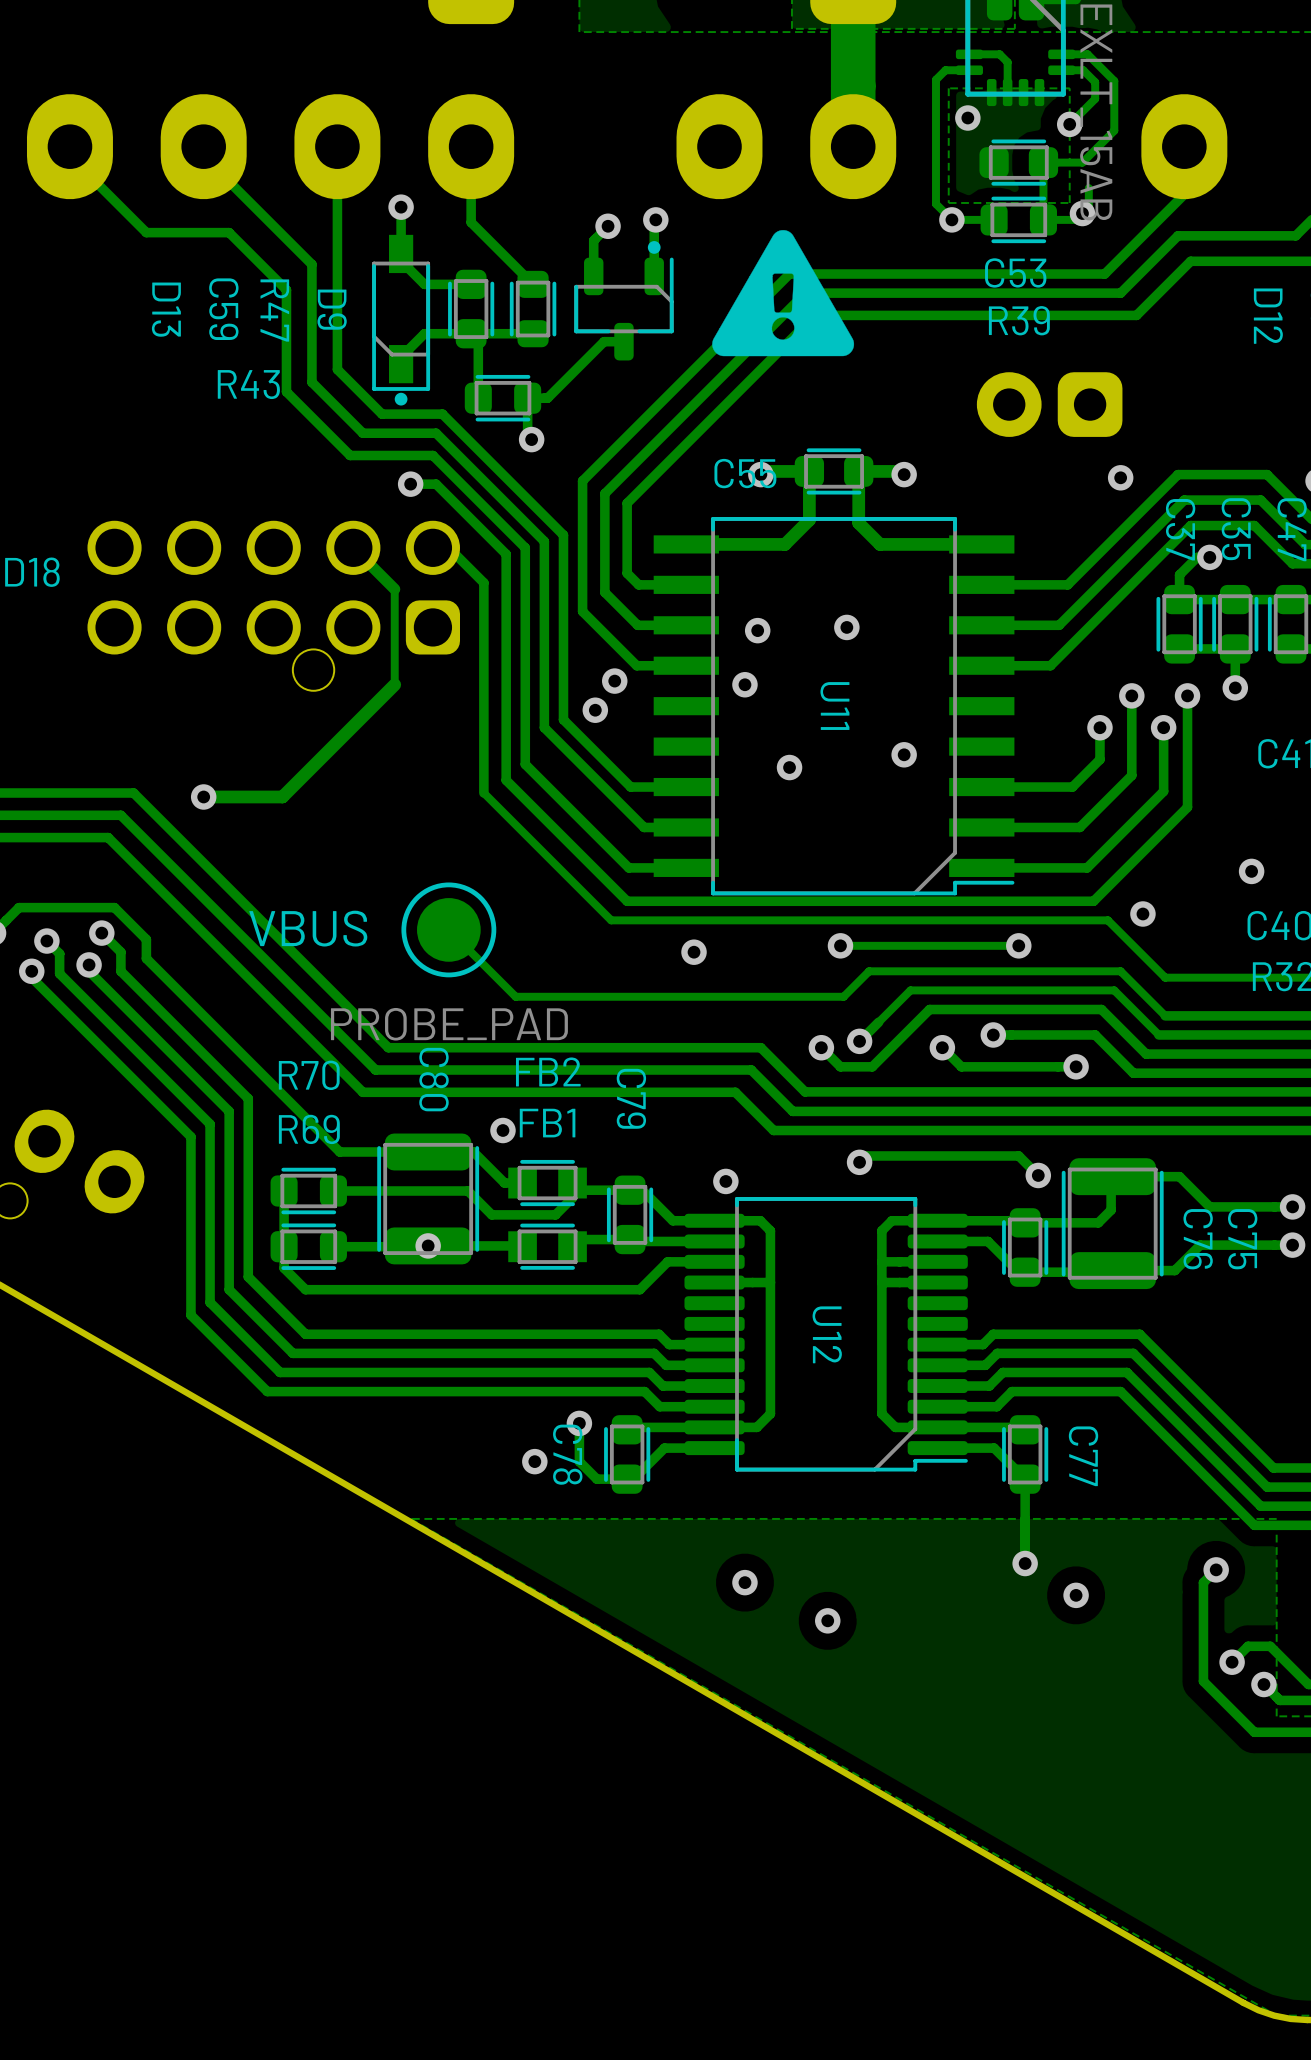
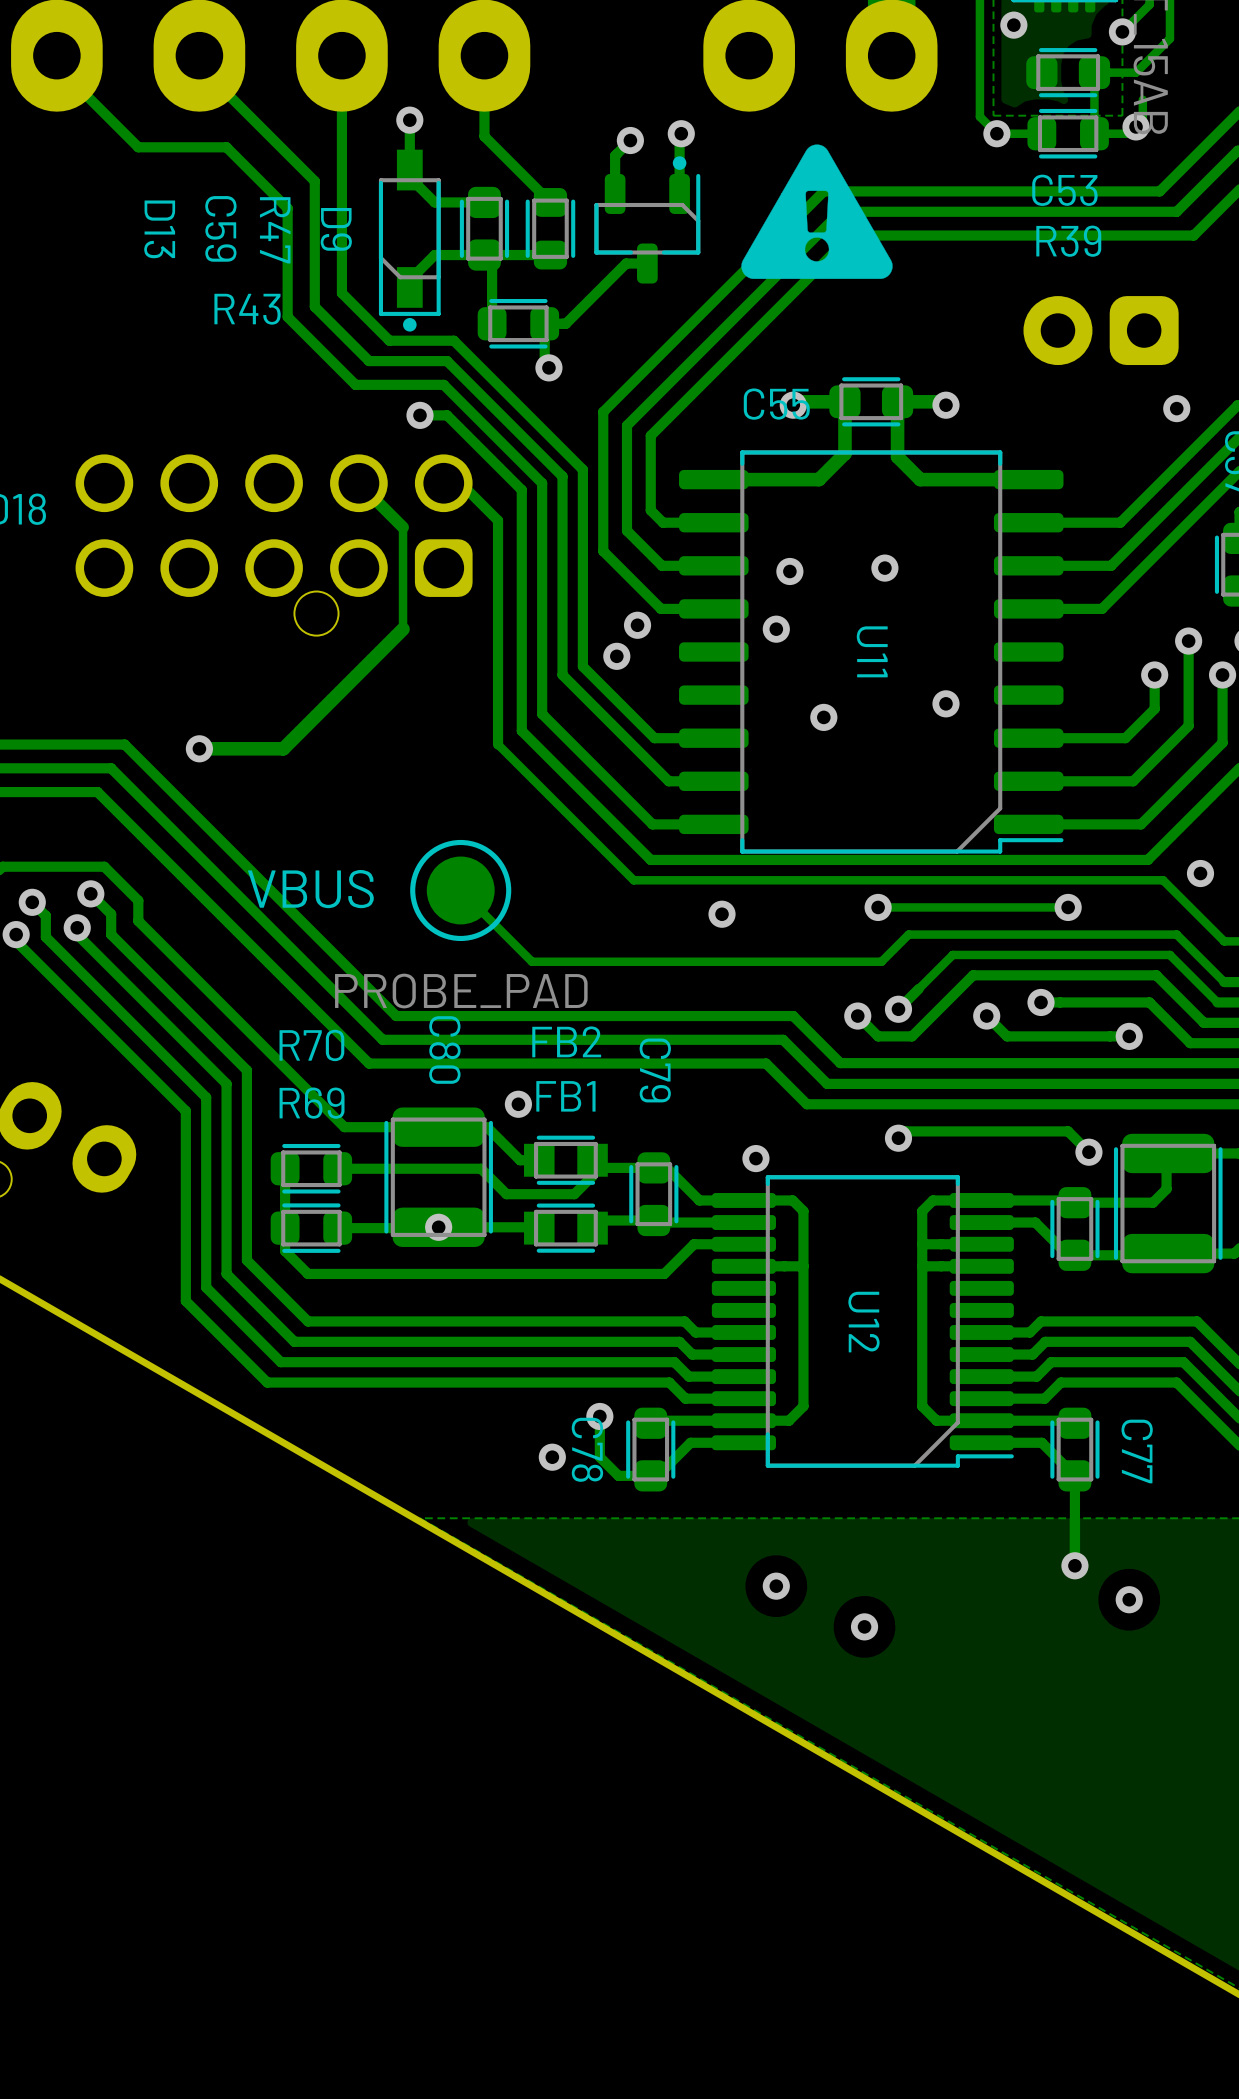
U11 footprint: [653, 517, 1015, 896] -> [679, 450, 1064, 854]

